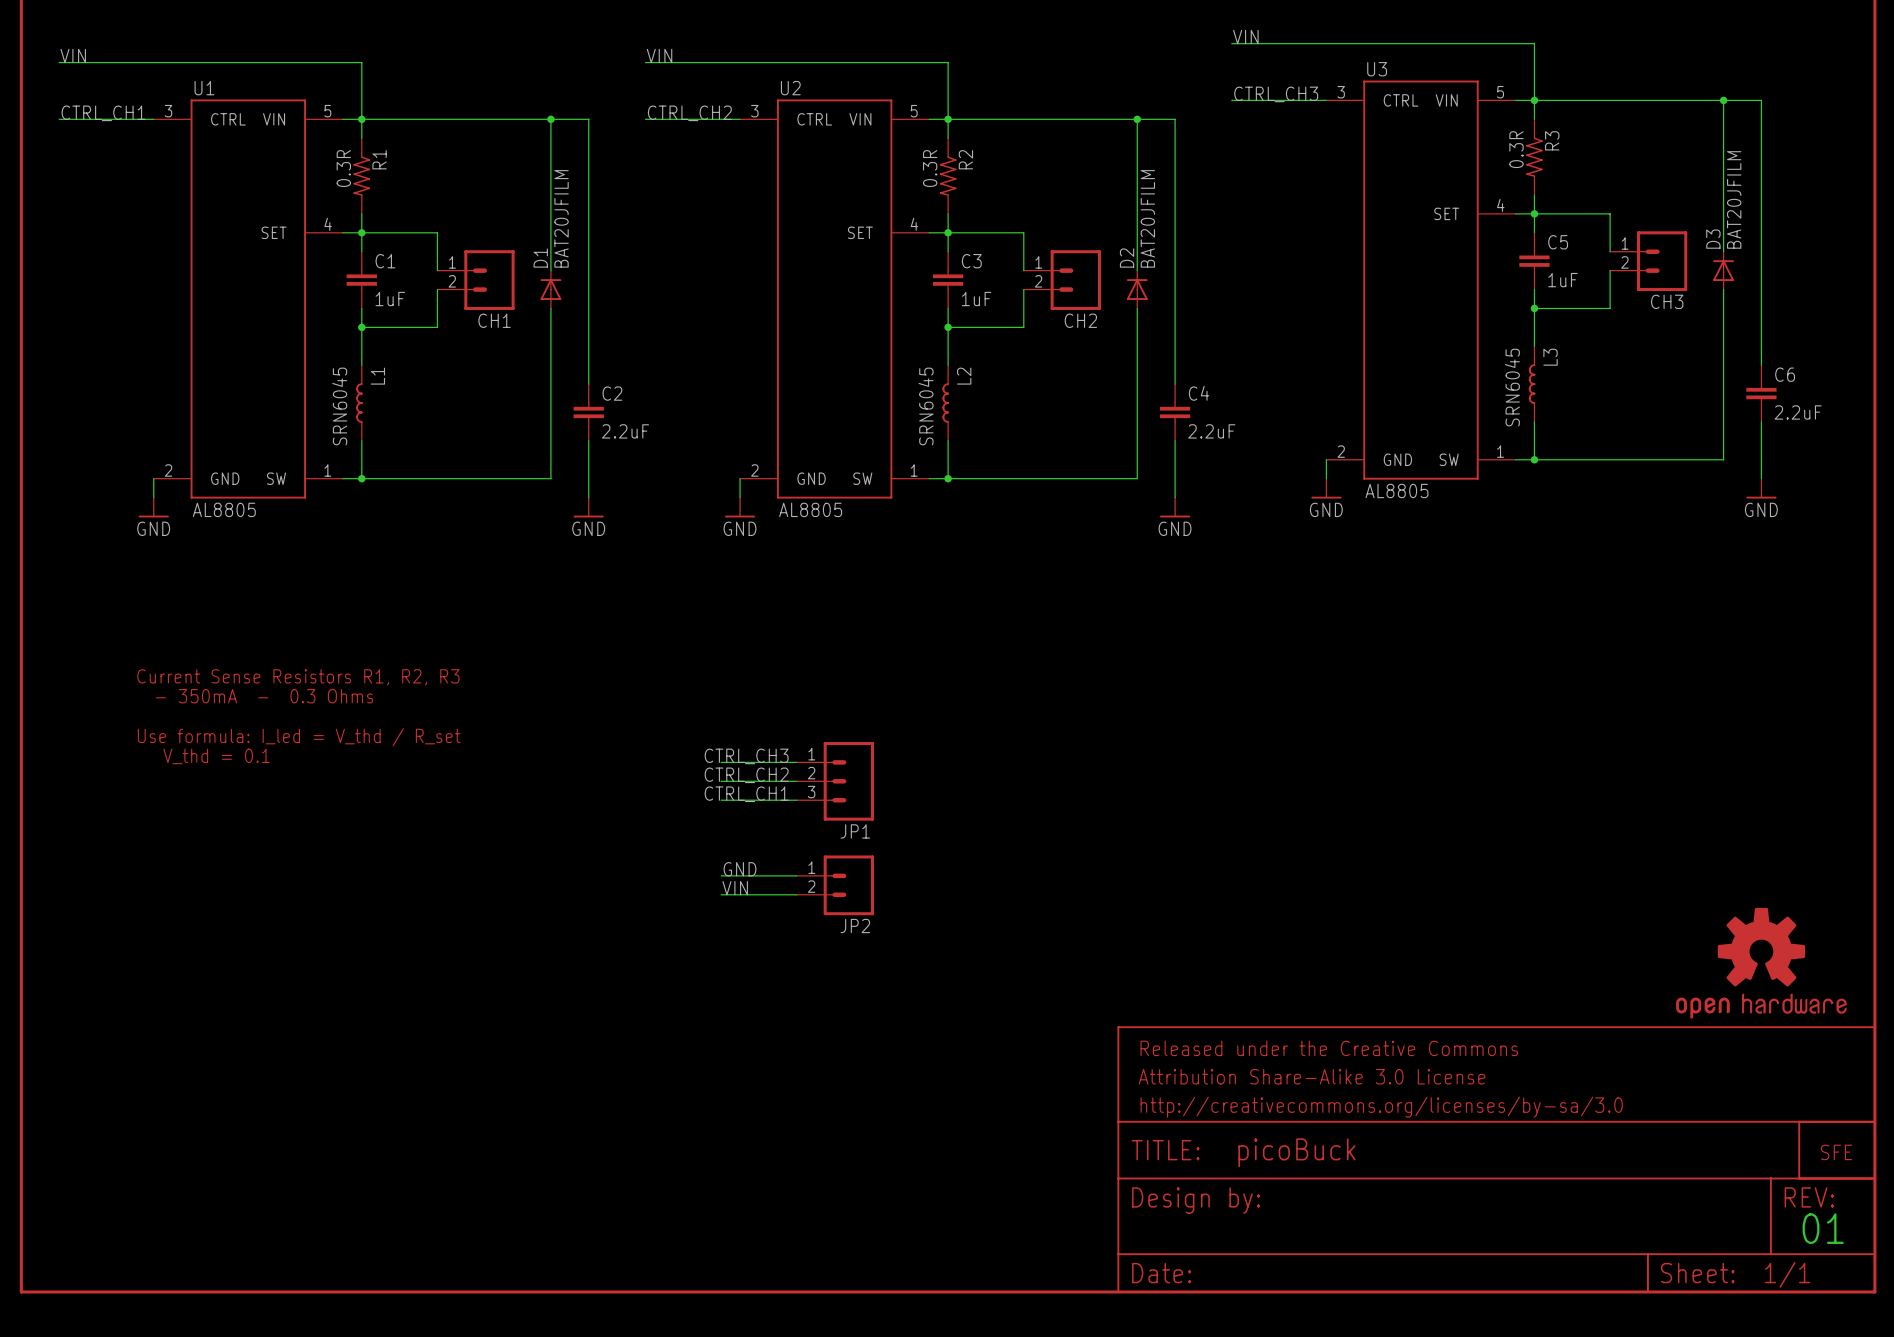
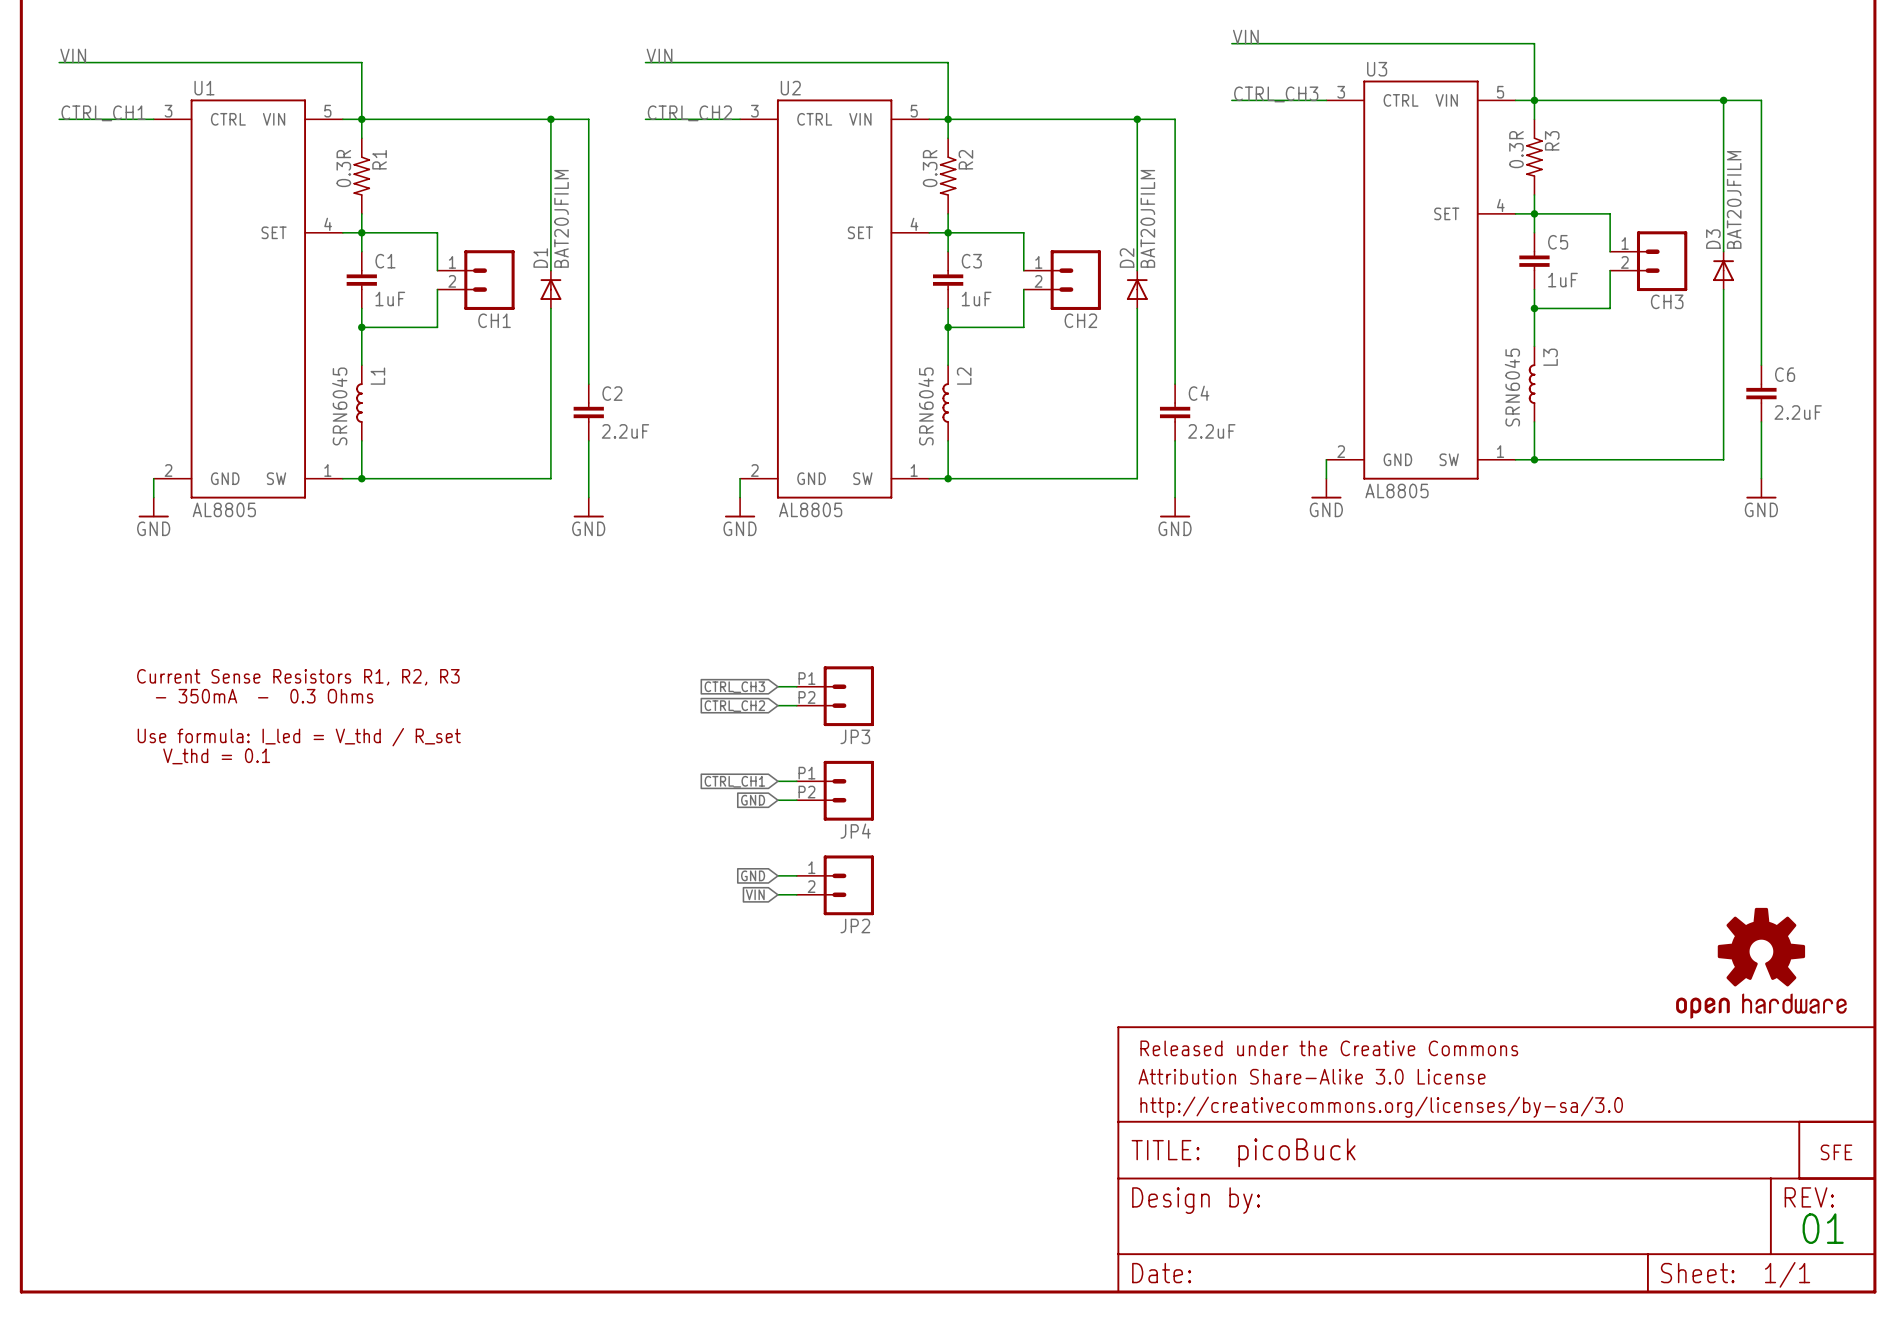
wire: none -> (777, 686) (796, 686)
global label: none -> CTRL_CH3 (734, 687)
JP3: none -> (835, 696)
wire: none -> (777, 705) (796, 705)
global label: none -> CTRL_CH2 (734, 706)
label: CTRL_CH3 (746, 756) -> none
wire: (721, 762) (796, 762) -> none
label: CTRL_CH2 (746, 775) -> none
wire: (721, 781) (777, 781) -> none
global label: none -> CTRL_CH1 (734, 781)
JP1: (835, 781) -> none
JP4: none -> (835, 790)
label: CTRL_CH1 (746, 794) -> none
wire: (721, 800) (777, 800) -> none
global label: none -> GND (753, 800)
label: GND (740, 869) -> none
wire: (721, 875) (777, 875) -> none
global label: none -> GND (753, 875)
label: VIN (735, 888) -> none
wire: (721, 894) (777, 894) -> none
global label: none -> VIN (755, 894)

